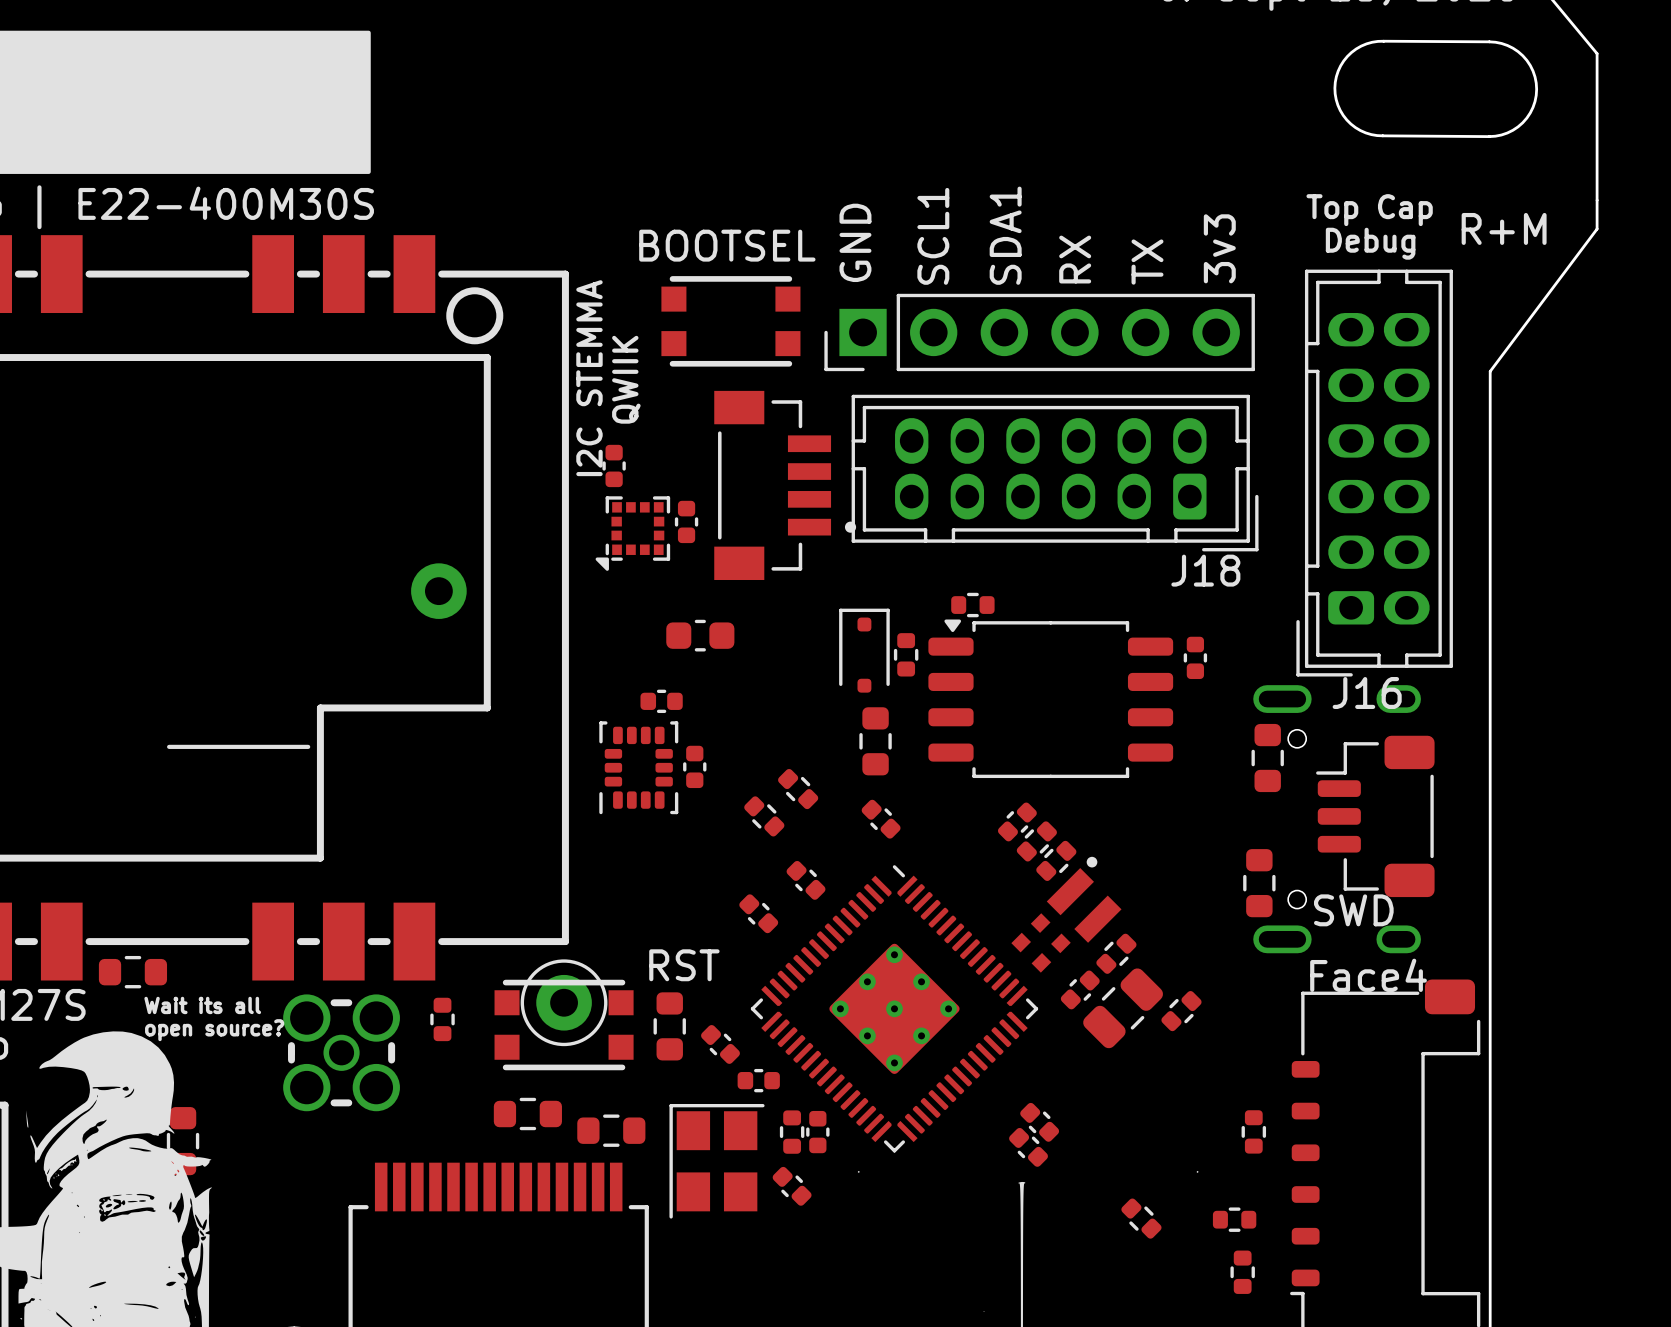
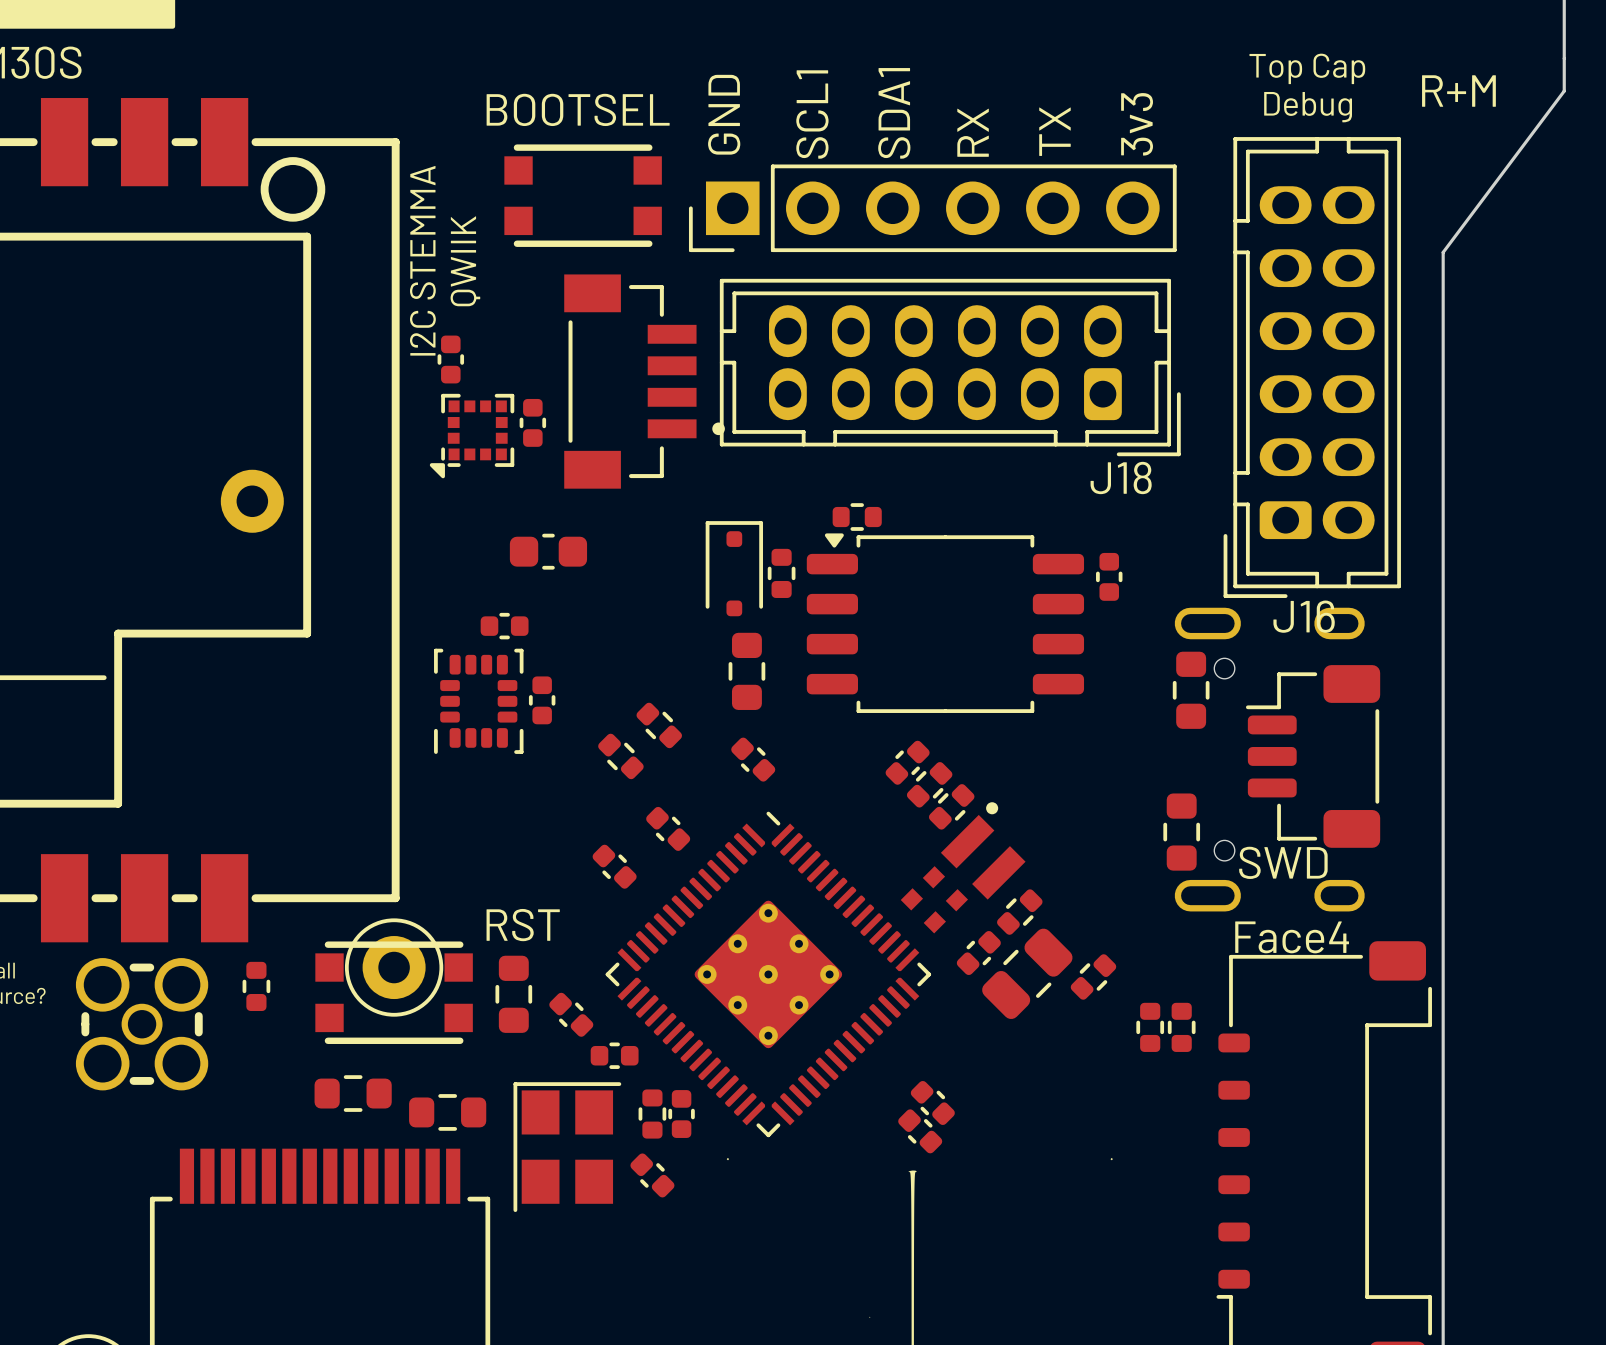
part: none -> (1150, 1027)
part: none -> (1181, 1027)
part: (1253, 1131) -> none
part: (1141, 1218) -> none
part: (1234, 1219) -> none
part: (1242, 1272) -> none

